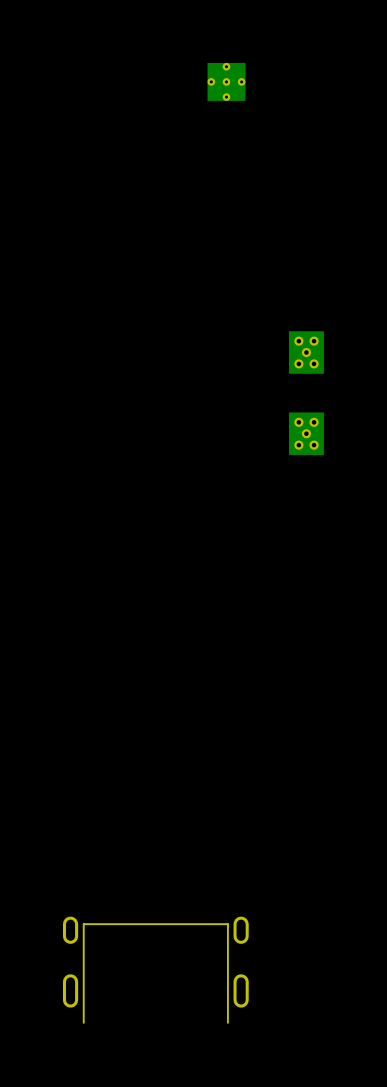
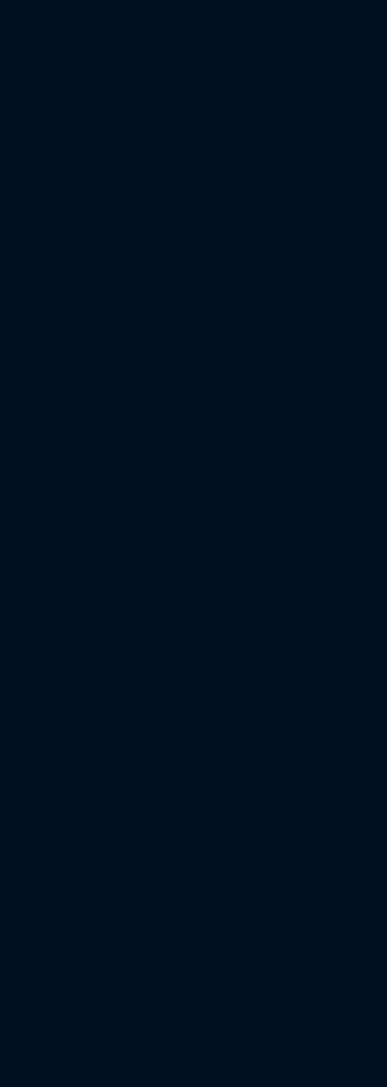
part: (226, 81) -> none
part: (306, 352) -> none
part: (306, 433) -> none
part: (155, 970) -> none

